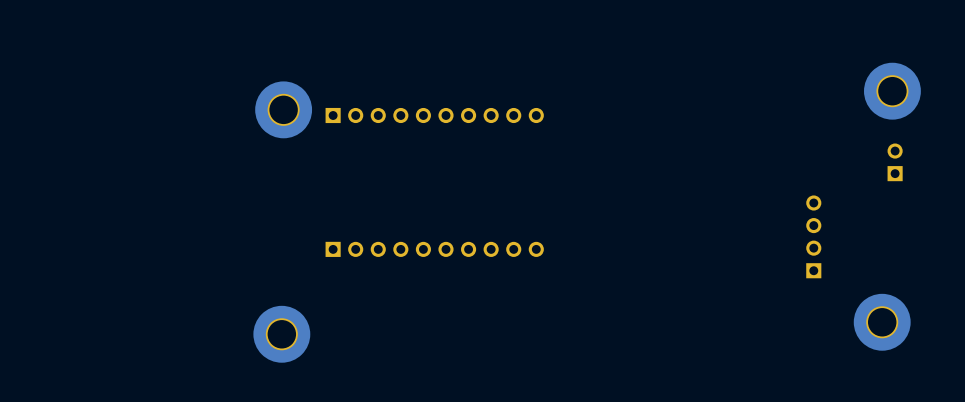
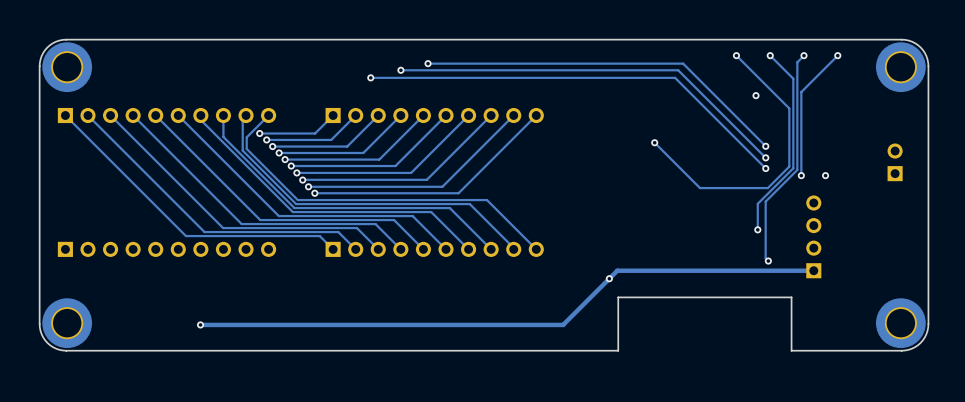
board edge: none -> (901, 39) (66, 39) (56, 41) (45, 50) (39, 66) (39, 324) (41, 334) (50, 345) (66, 350) (618, 350) (618, 297) (791, 297) (791, 350) (901, 350) (911, 348) (922, 340) (928, 324) (928, 66) (926, 56) (920, 47) (911, 41) (901, 39)
track: none -> (736, 55) (789, 108) (789, 166) (767, 188) (700, 188) (654, 142)
via: none -> (736, 55)
track: none -> (770, 55) (793, 78) (793, 168) (757, 203) (757, 229)
via: none -> (770, 55)
track: none -> (804, 55) (797, 62) (797, 169) (765, 201) (765, 258) (768, 261)
via: none -> (804, 55)
track: none -> (837, 55) (801, 92) (801, 175)
via: none -> (837, 55)
track: none -> (428, 63) (683, 63) (765, 146)
via: none -> (428, 63)
part: none -> (67, 67)
part: none -> (900, 67)
track: none -> (400, 70) (678, 70) (765, 157)
via: none -> (400, 70)
track: none -> (370, 77) (675, 77) (765, 168)
via: none -> (370, 77)
part: (892, 91) -> none
via: none -> (756, 95)
part: (283, 109) -> none
track: none -> (65, 115) (185, 236) (319, 236) (333, 249)
track: none -> (87, 115) (204, 232) (338, 232) (355, 249)
track: none -> (110, 115) (223, 228) (356, 228) (378, 249)
track: none -> (133, 115) (241, 224) (375, 224) (400, 249)
track: none -> (155, 115) (260, 220) (394, 220) (423, 249)
part: none -> (167, 115)
track: none -> (178, 115) (278, 216) (412, 216) (446, 249)
track: none -> (200, 115) (200, 120) (292, 212) (431, 212) (468, 249)
track: none -> (223, 115) (223, 136) (294, 208) (449, 208) (491, 249)
track: none -> (246, 115) (242, 118) (242, 150) (296, 204) (469, 204) (513, 249)
track: none -> (268, 115) (246, 137) (246, 148) (297, 200) (486, 200) (536, 249)
track: none -> (333, 115) (315, 133) (259, 133)
track: none -> (355, 115) (331, 139) (266, 139)
track: none -> (378, 115) (347, 146) (272, 146)
track: none -> (400, 115) (363, 152) (279, 152)
track: none -> (423, 115) (379, 159) (285, 159)
track: none -> (446, 115) (395, 166) (291, 166)
track: none -> (468, 115) (411, 172) (296, 172)
track: none -> (491, 115) (426, 179) (302, 180)
track: none -> (513, 115) (442, 186) (308, 186)
track: none -> (536, 115) (458, 193) (314, 193)
via: none -> (259, 133)
via: none -> (266, 139)
via: none -> (654, 142)
via: none -> (272, 146)
via: none -> (765, 146)
via: none -> (279, 152)
via: none -> (765, 157)
via: none -> (285, 159)
via: none -> (291, 166)
via: none -> (765, 168)
via: none -> (296, 172)
via: none -> (801, 175)
via: none -> (825, 175)
via: none -> (302, 180)
via: none -> (308, 186)
via: none -> (314, 193)
via: none -> (757, 229)
part: none -> (167, 249)
via: none -> (768, 261)
track: none -> (813, 270) (617, 270) (563, 324) (200, 324)
via: none -> (609, 278)
part: (882, 322) -> none
part: none -> (67, 323)
part: none -> (900, 323)
via: none -> (200, 324)
part: (281, 334) -> none

